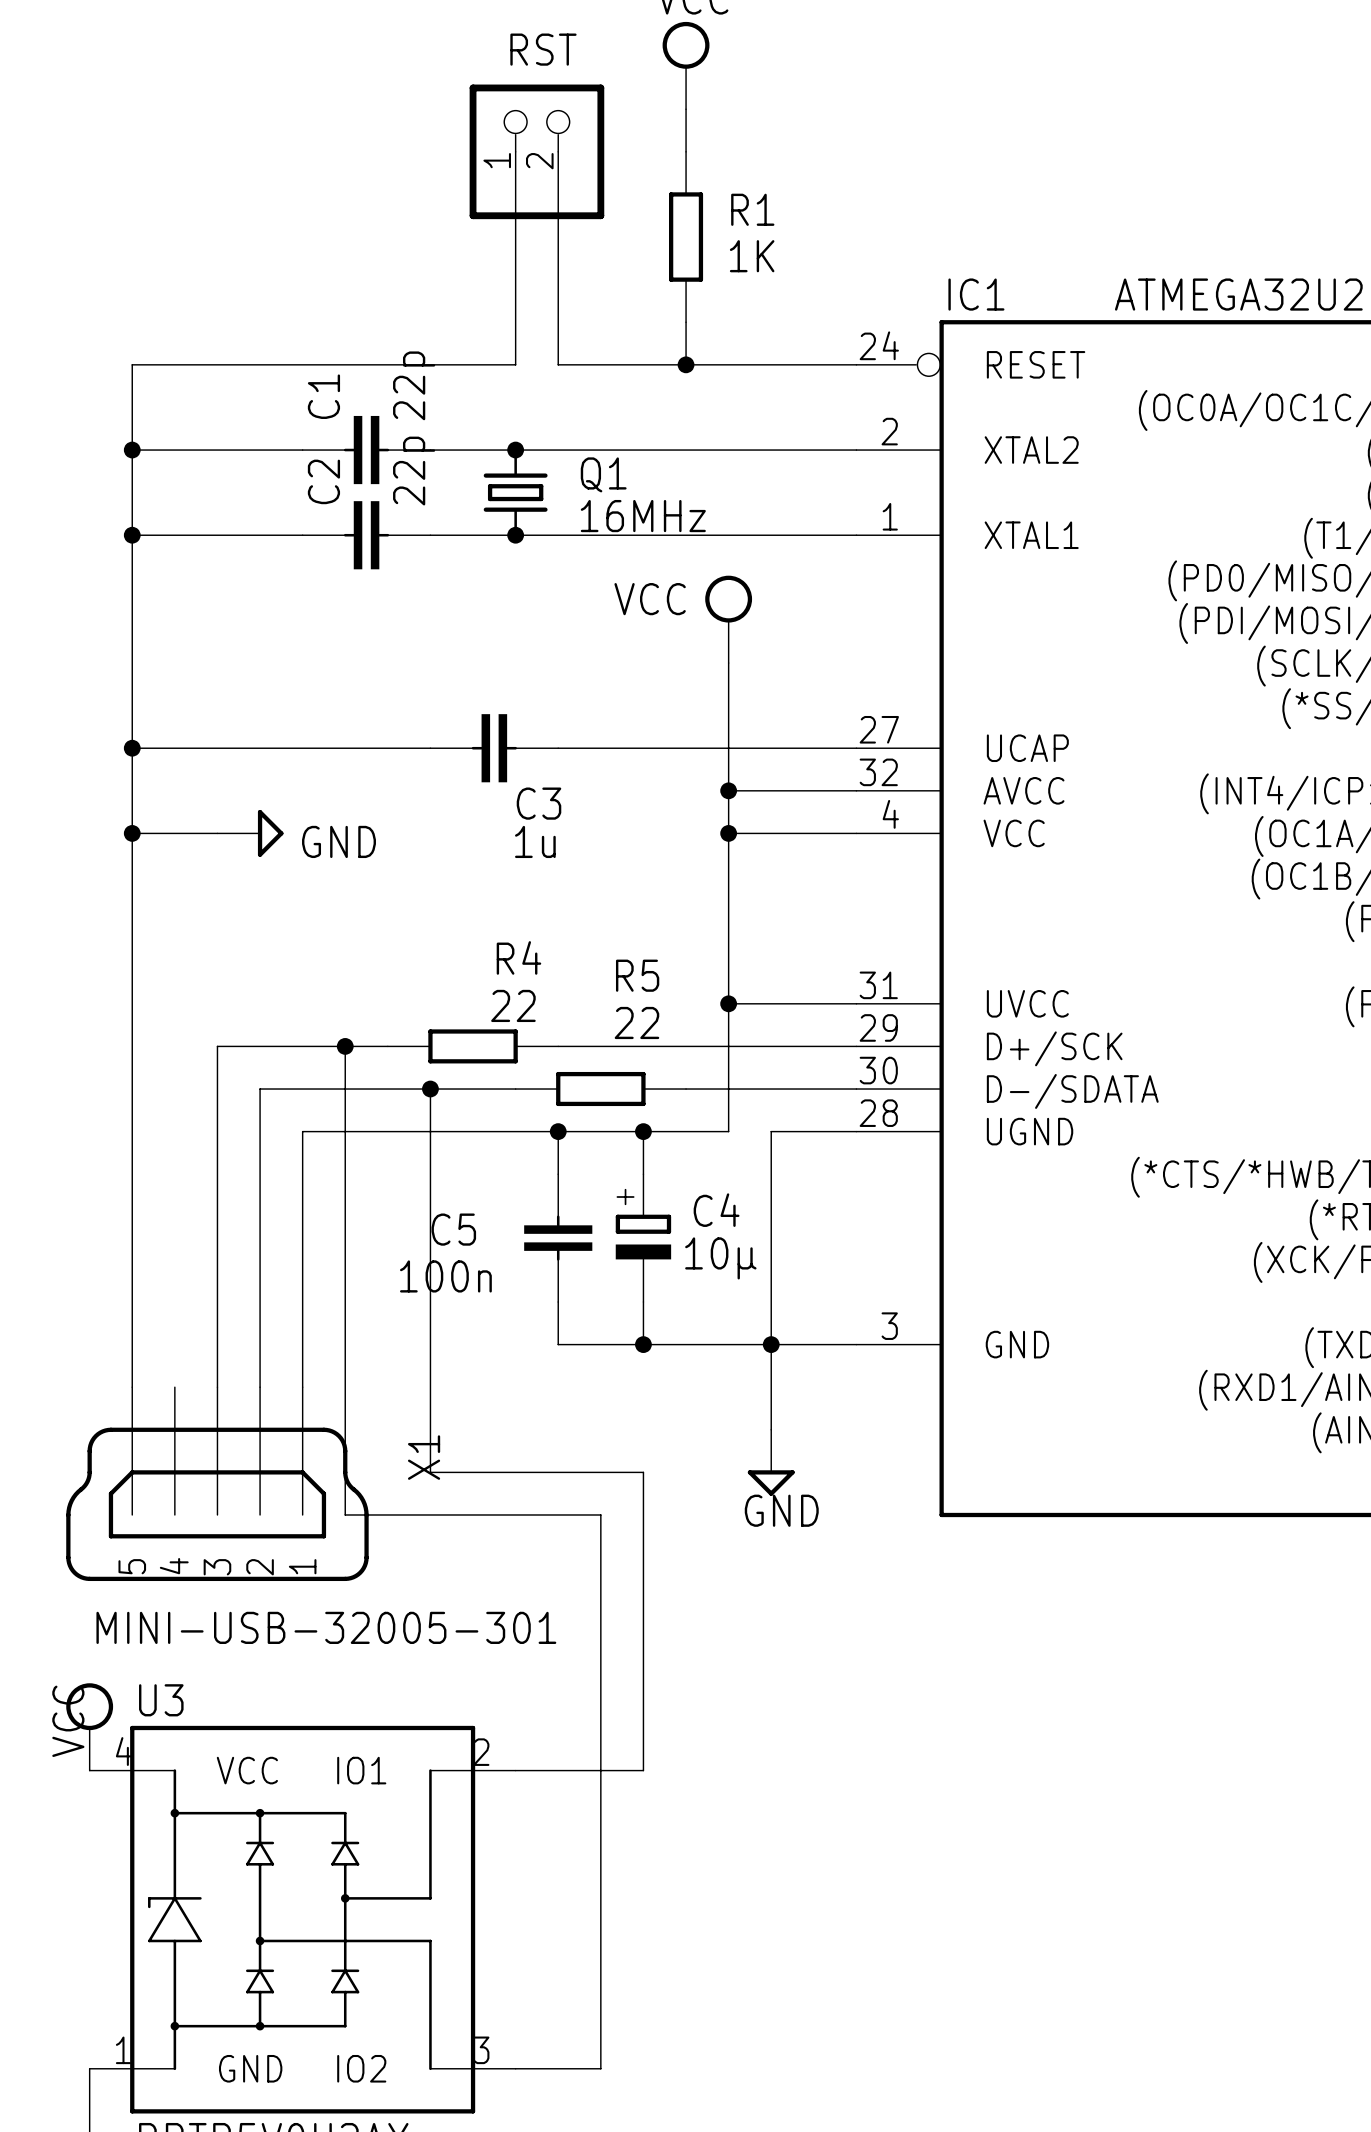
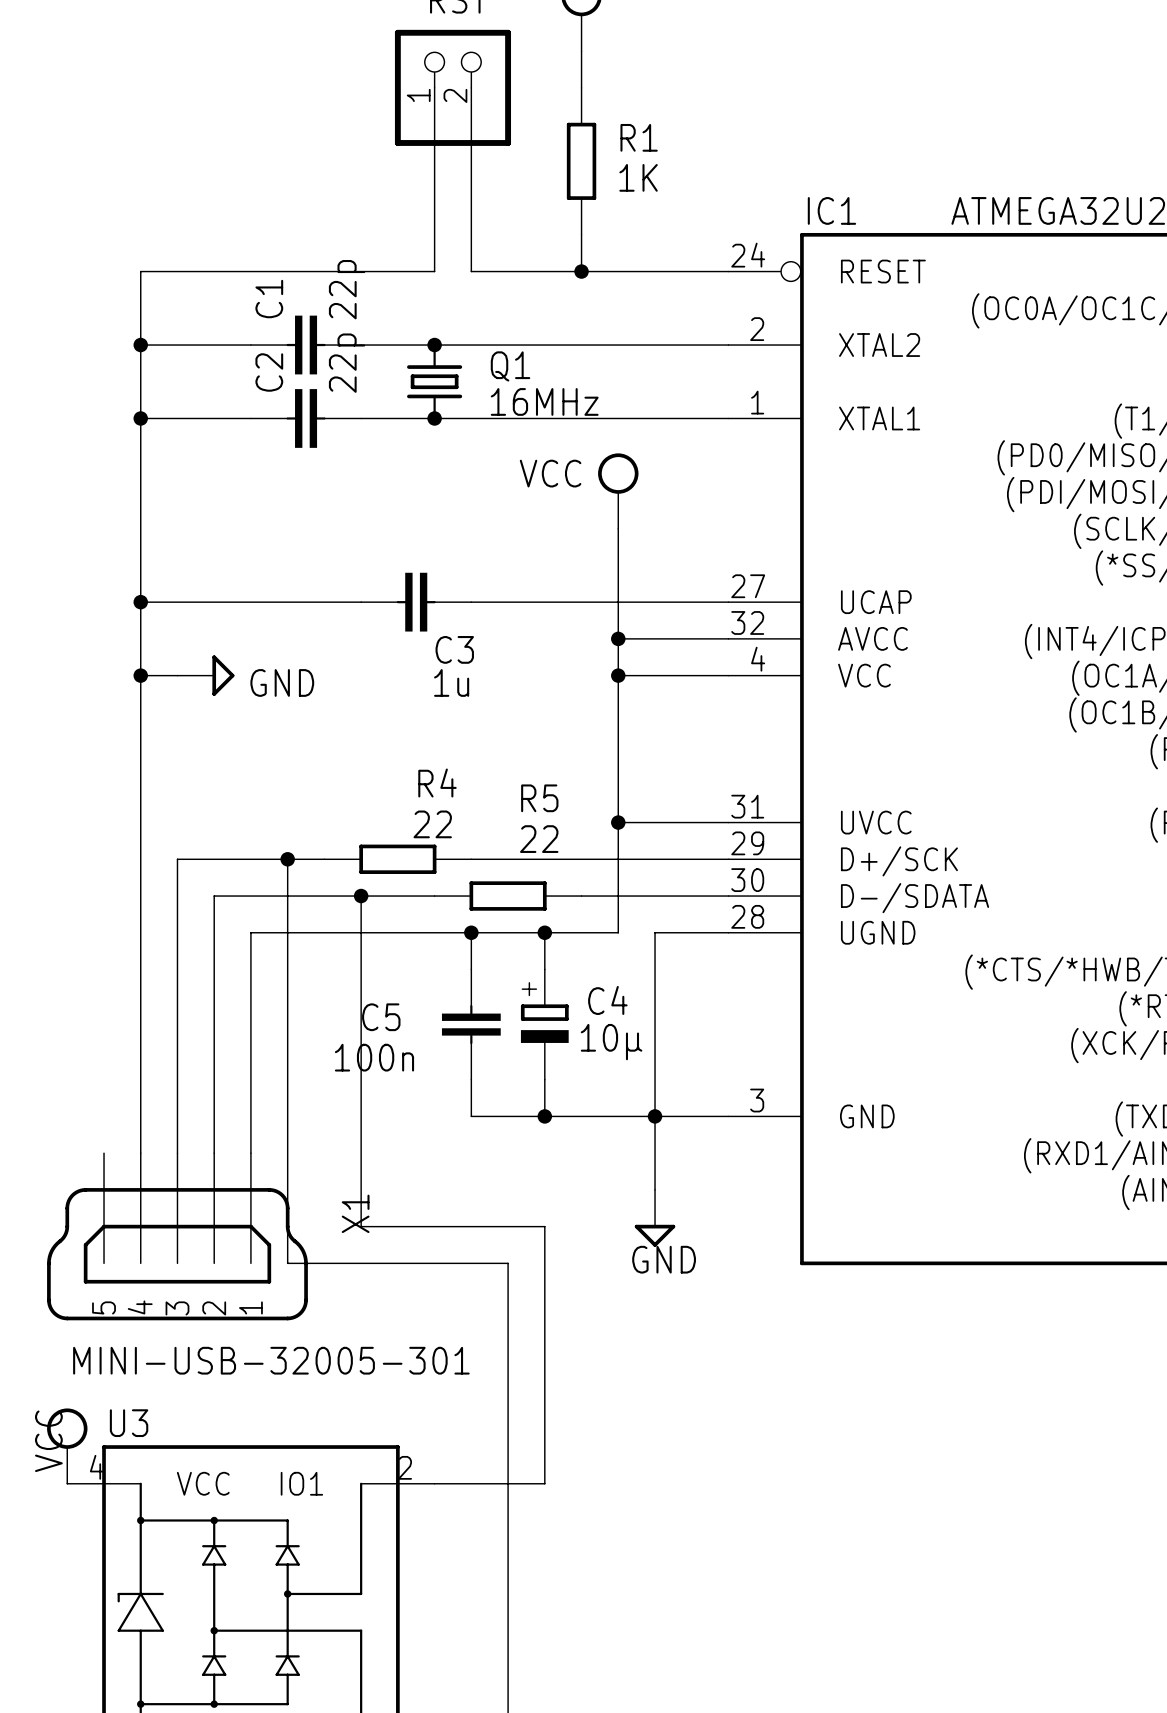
wire: (174, 364) (132, 364) (132, 1387) -> (140, 271) (140, 1153)
wire: (132, 450) (174, 450) -> none
junction position: (132, 450) -> (140, 345)
wire: (132, 535) (174, 535) -> none
junction position: (132, 535) -> (140, 418)
wire: (132, 748) (174, 748) -> none
junction position: (132, 748) -> (140, 602)
wire: (132, 833) (174, 833) -> none
junction position: (132, 833) -> (140, 675)

